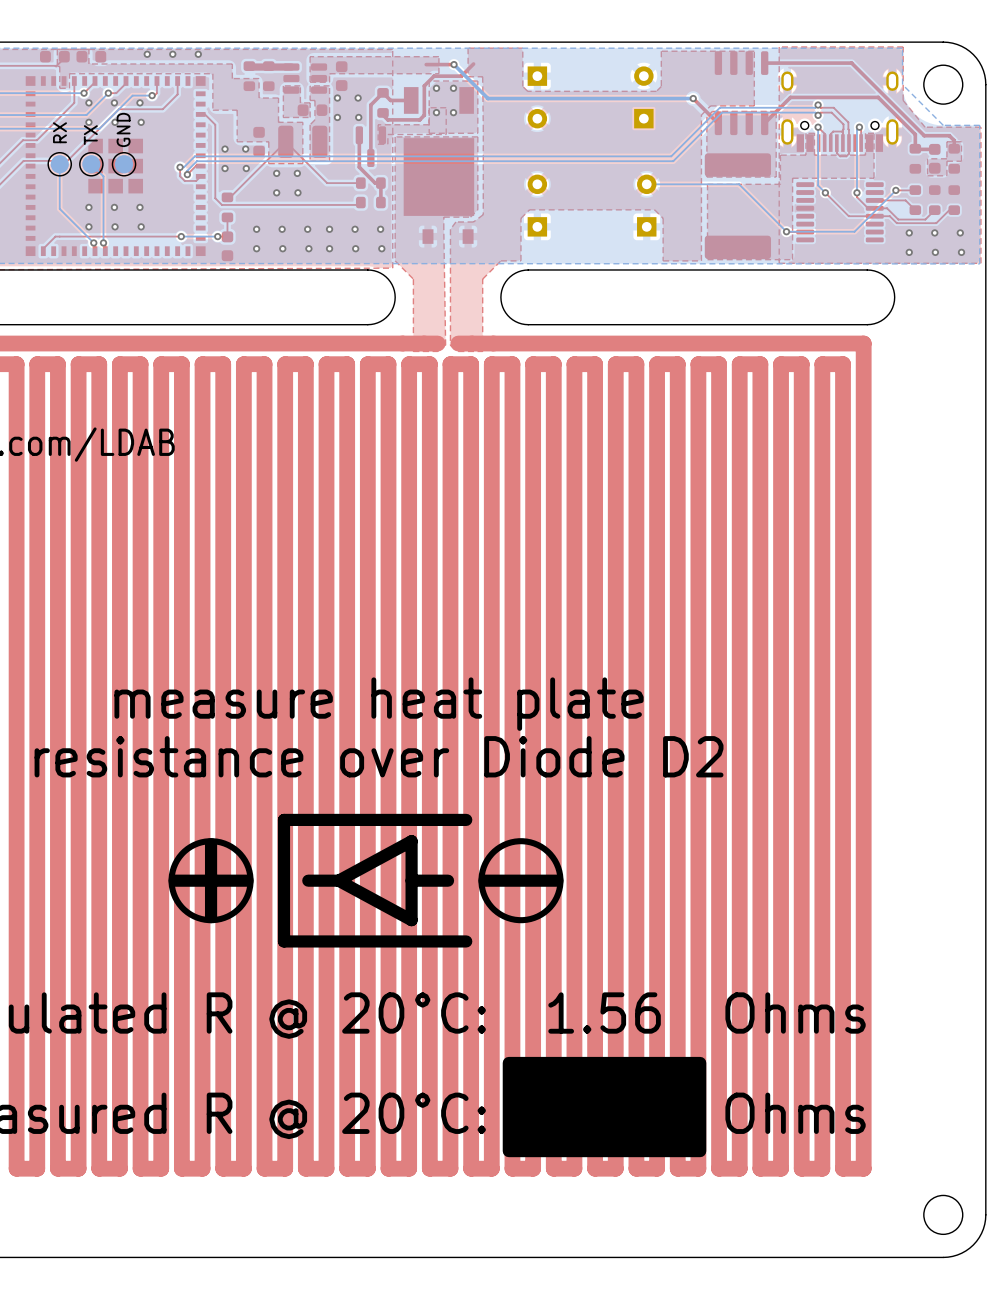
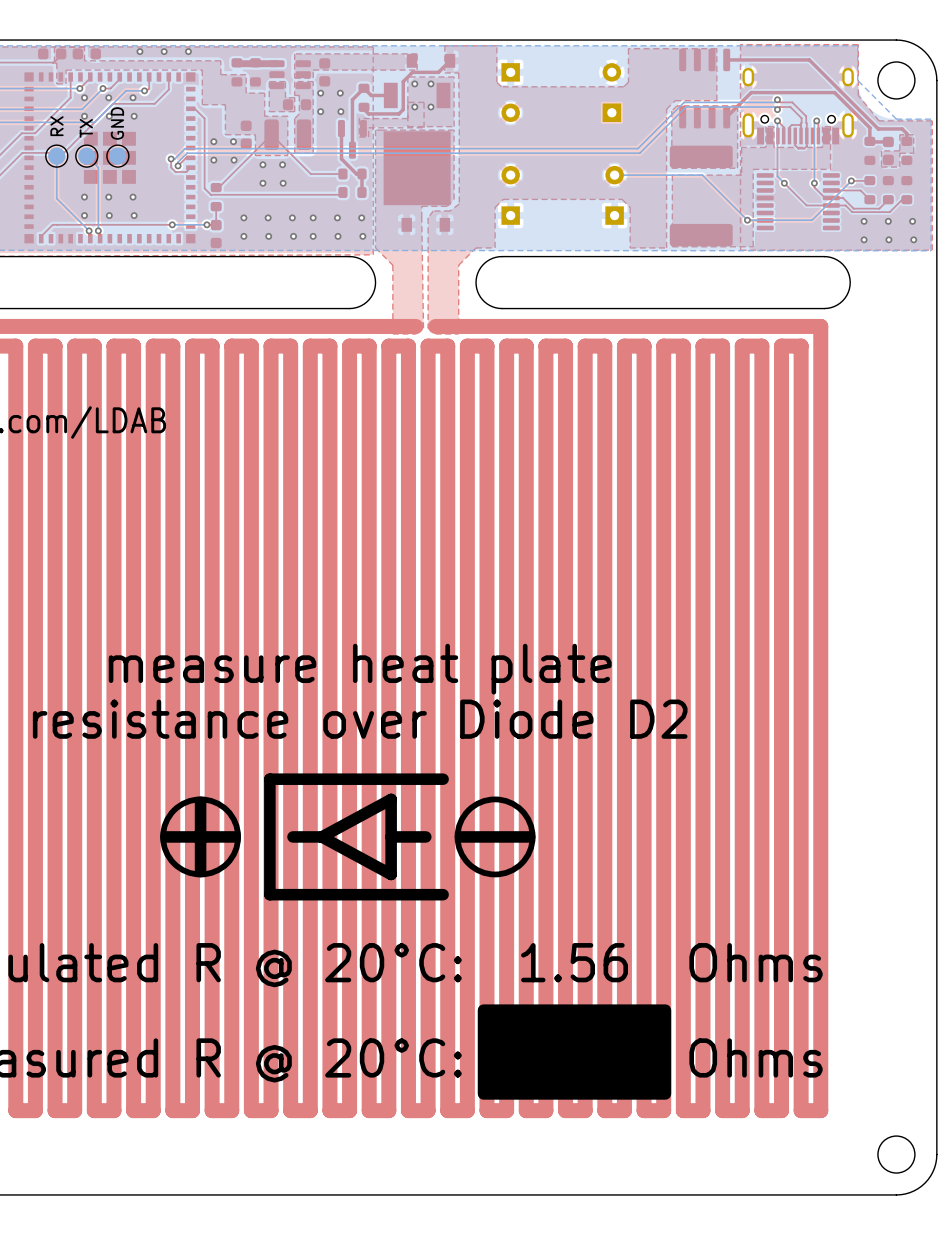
part: none -> (430, 60)
top track: (454, 64) (426, 64) -> none
bottom track: (454, 64) (487, 98) (693, 98) -> none
via: (454, 64) -> none
top track: (693, 98) (718, 123) -> none
via: (693, 98) -> none

